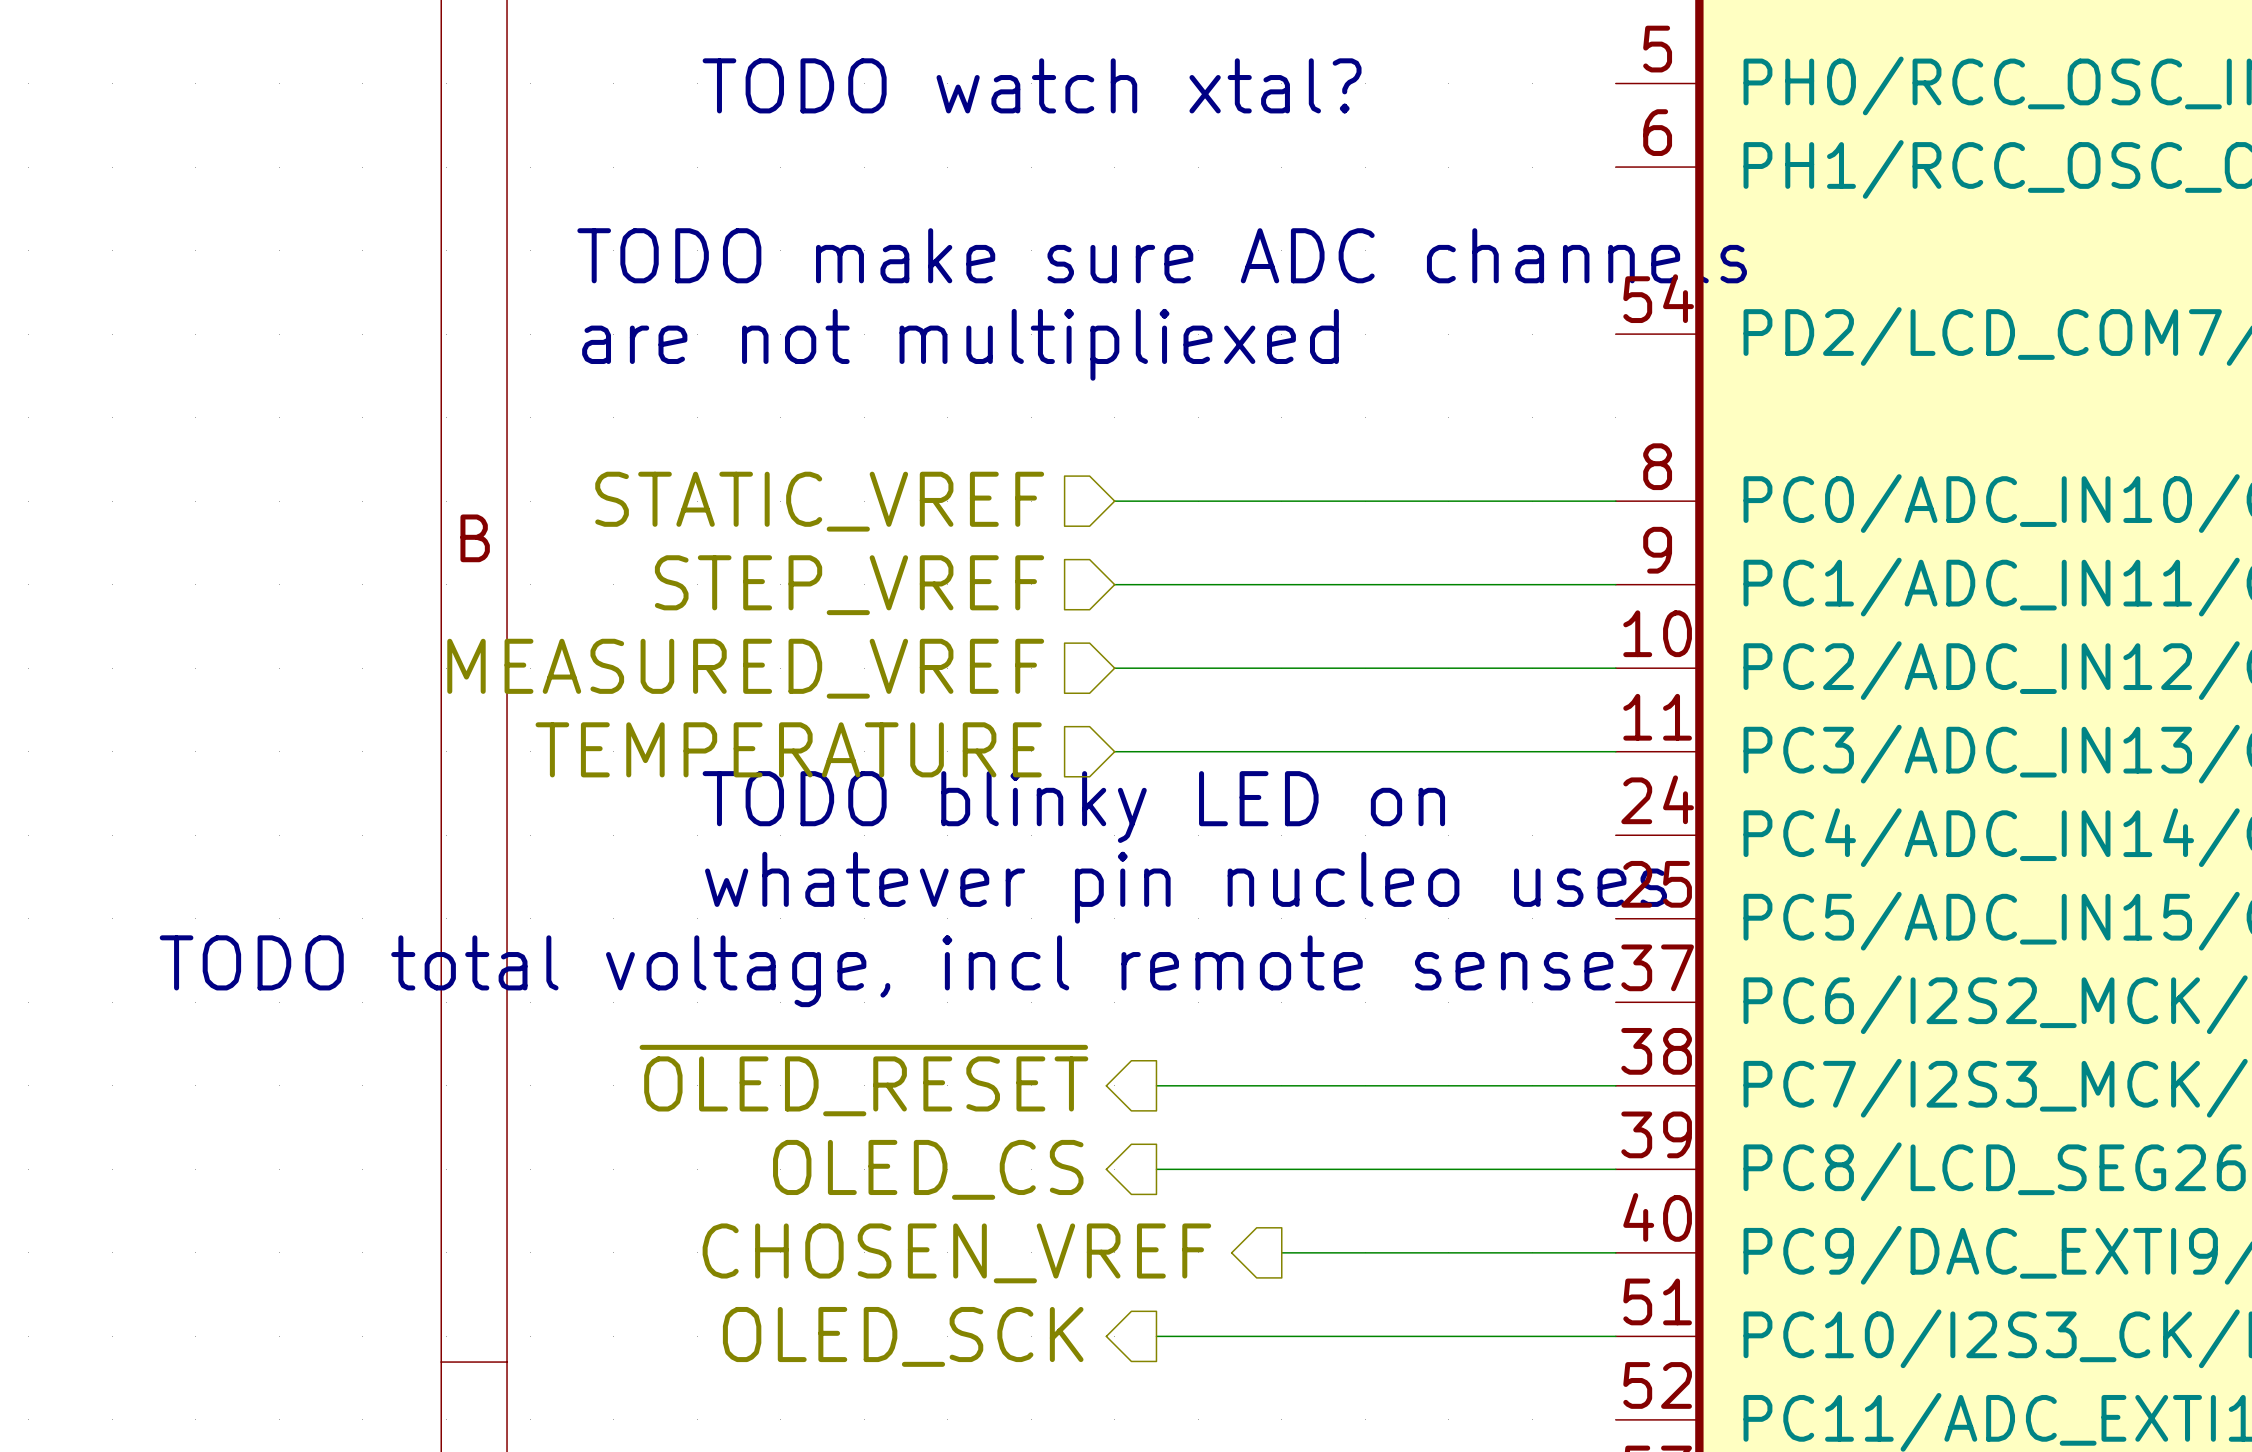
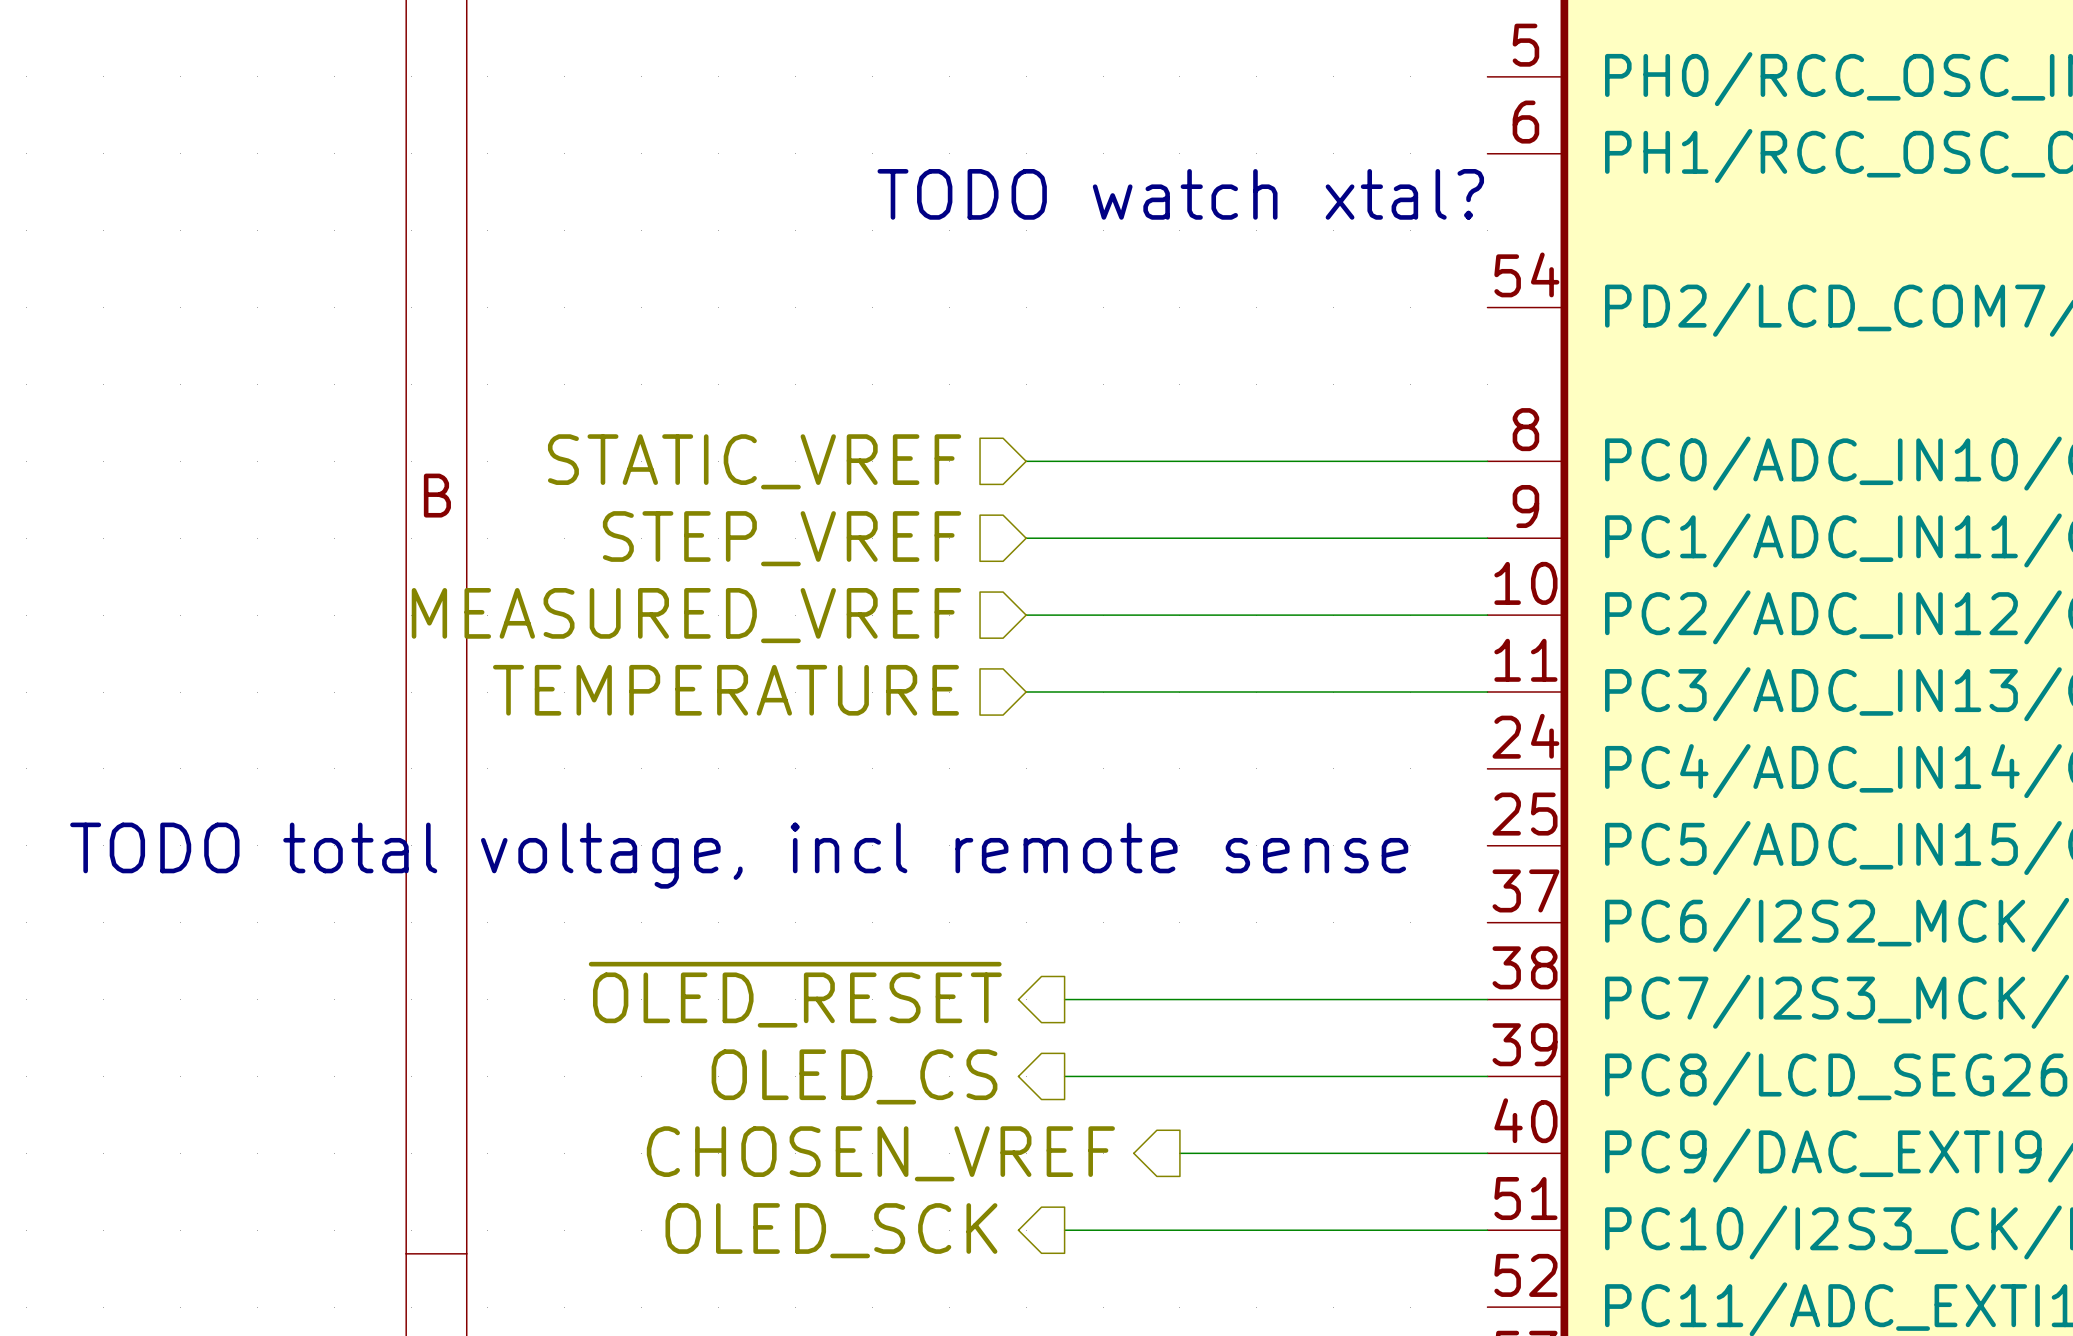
text position: TODO watch xtal? (1032, 85) -> TODO watch xtal? (1180, 194)
text: TODO make sure ADC channels (1162, 255) -> none
text: are not multipliexed (960, 344) -> none
text: TODO blinky LED on (1073, 807) -> none
text: whatever pin nucleo uses (1186, 887) -> none
text position: TODO total voltage, incl remote sense (886, 971) -> TODO total voltage, incl remote sense (739, 855)

